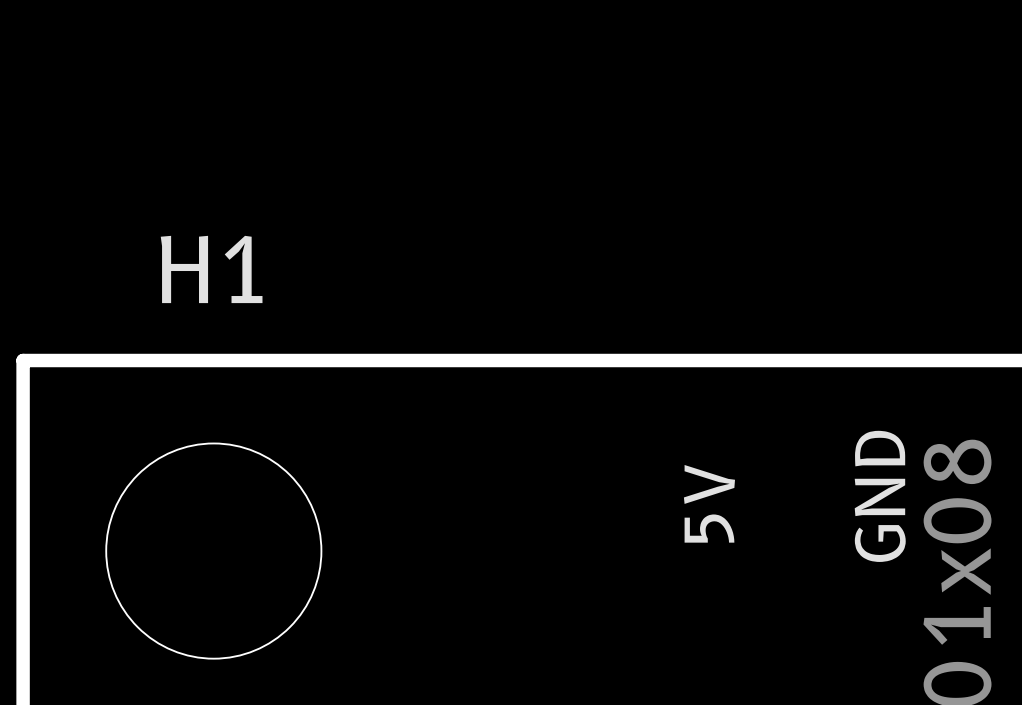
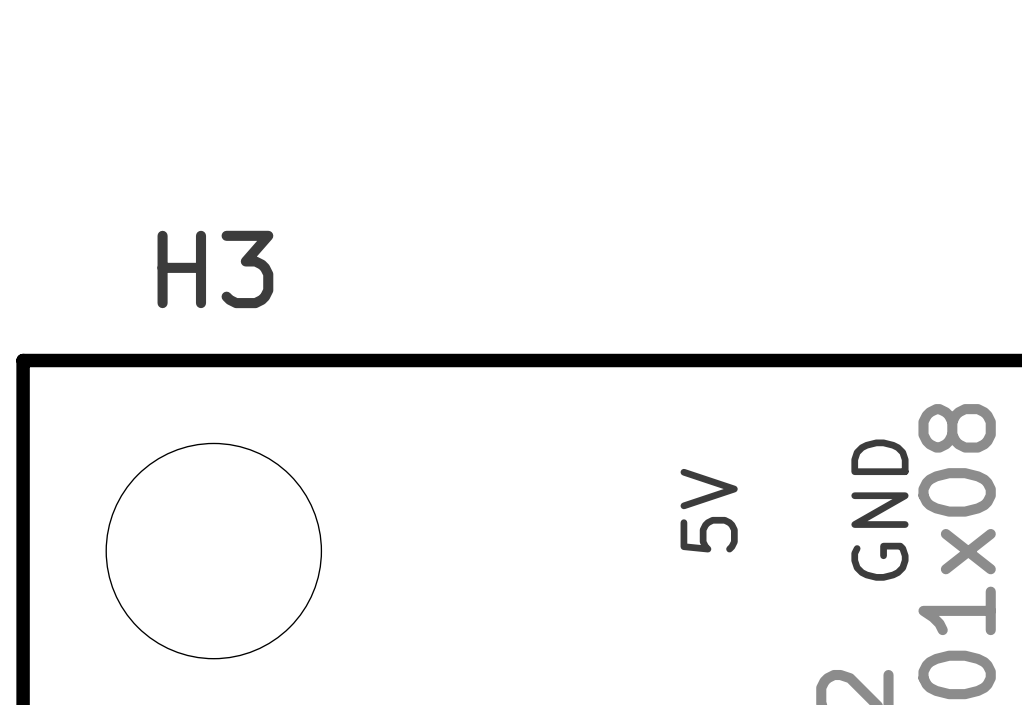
H1 name: H1 (211, 269) -> H3 (215, 269)

